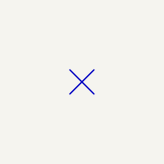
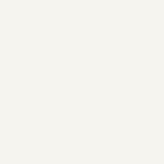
no-connect mark: (81, 81) -> none

